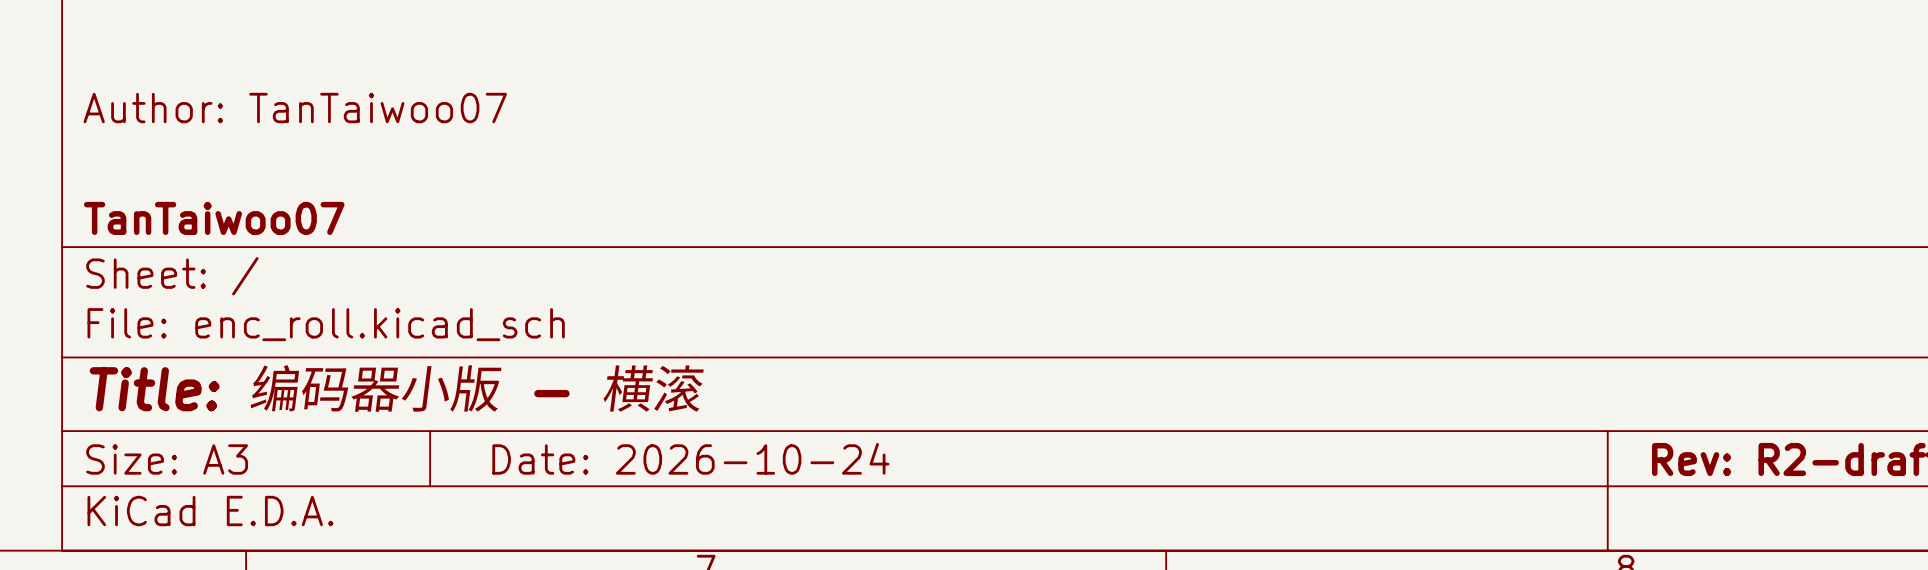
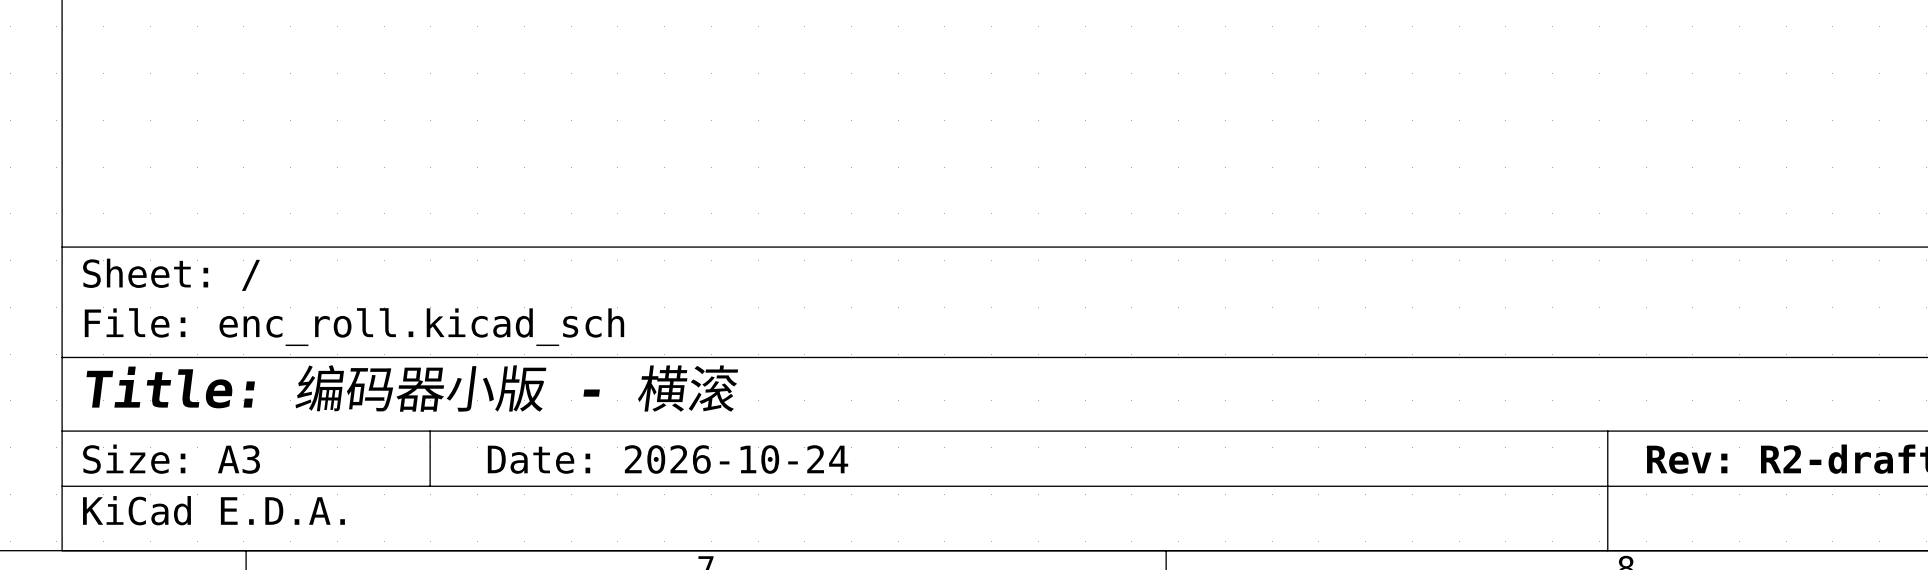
title block: Author: TanTaiwoo07 (295, 108) -> none
title block: TanTaiwoo07 (214, 218) -> none

